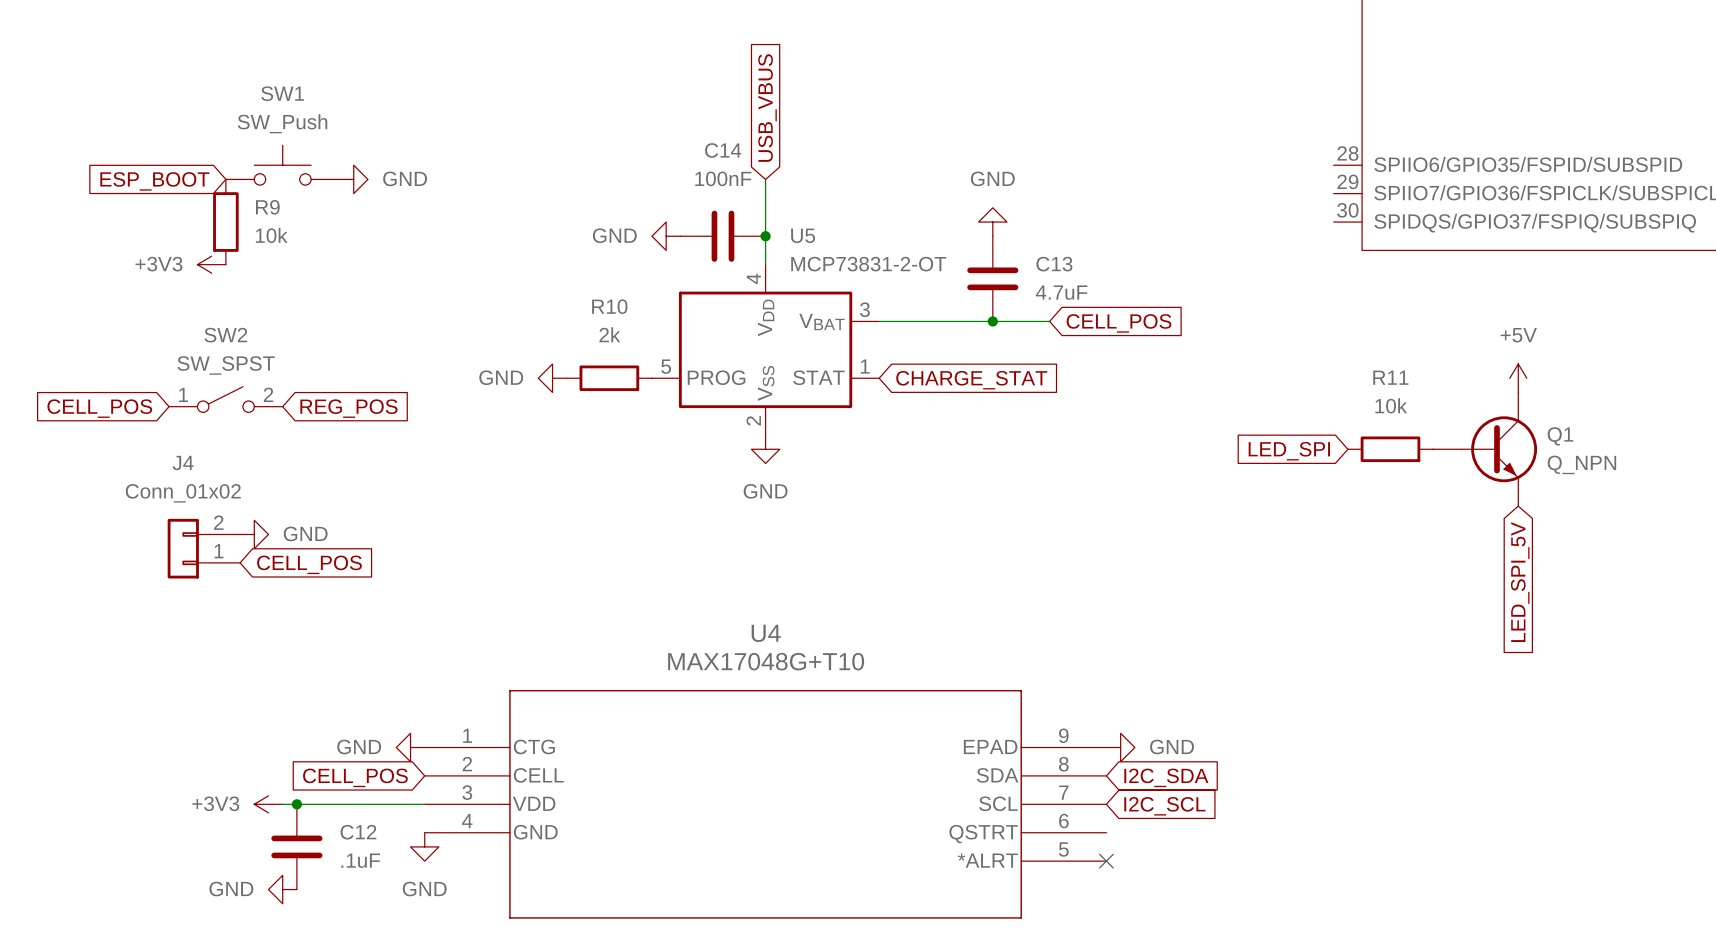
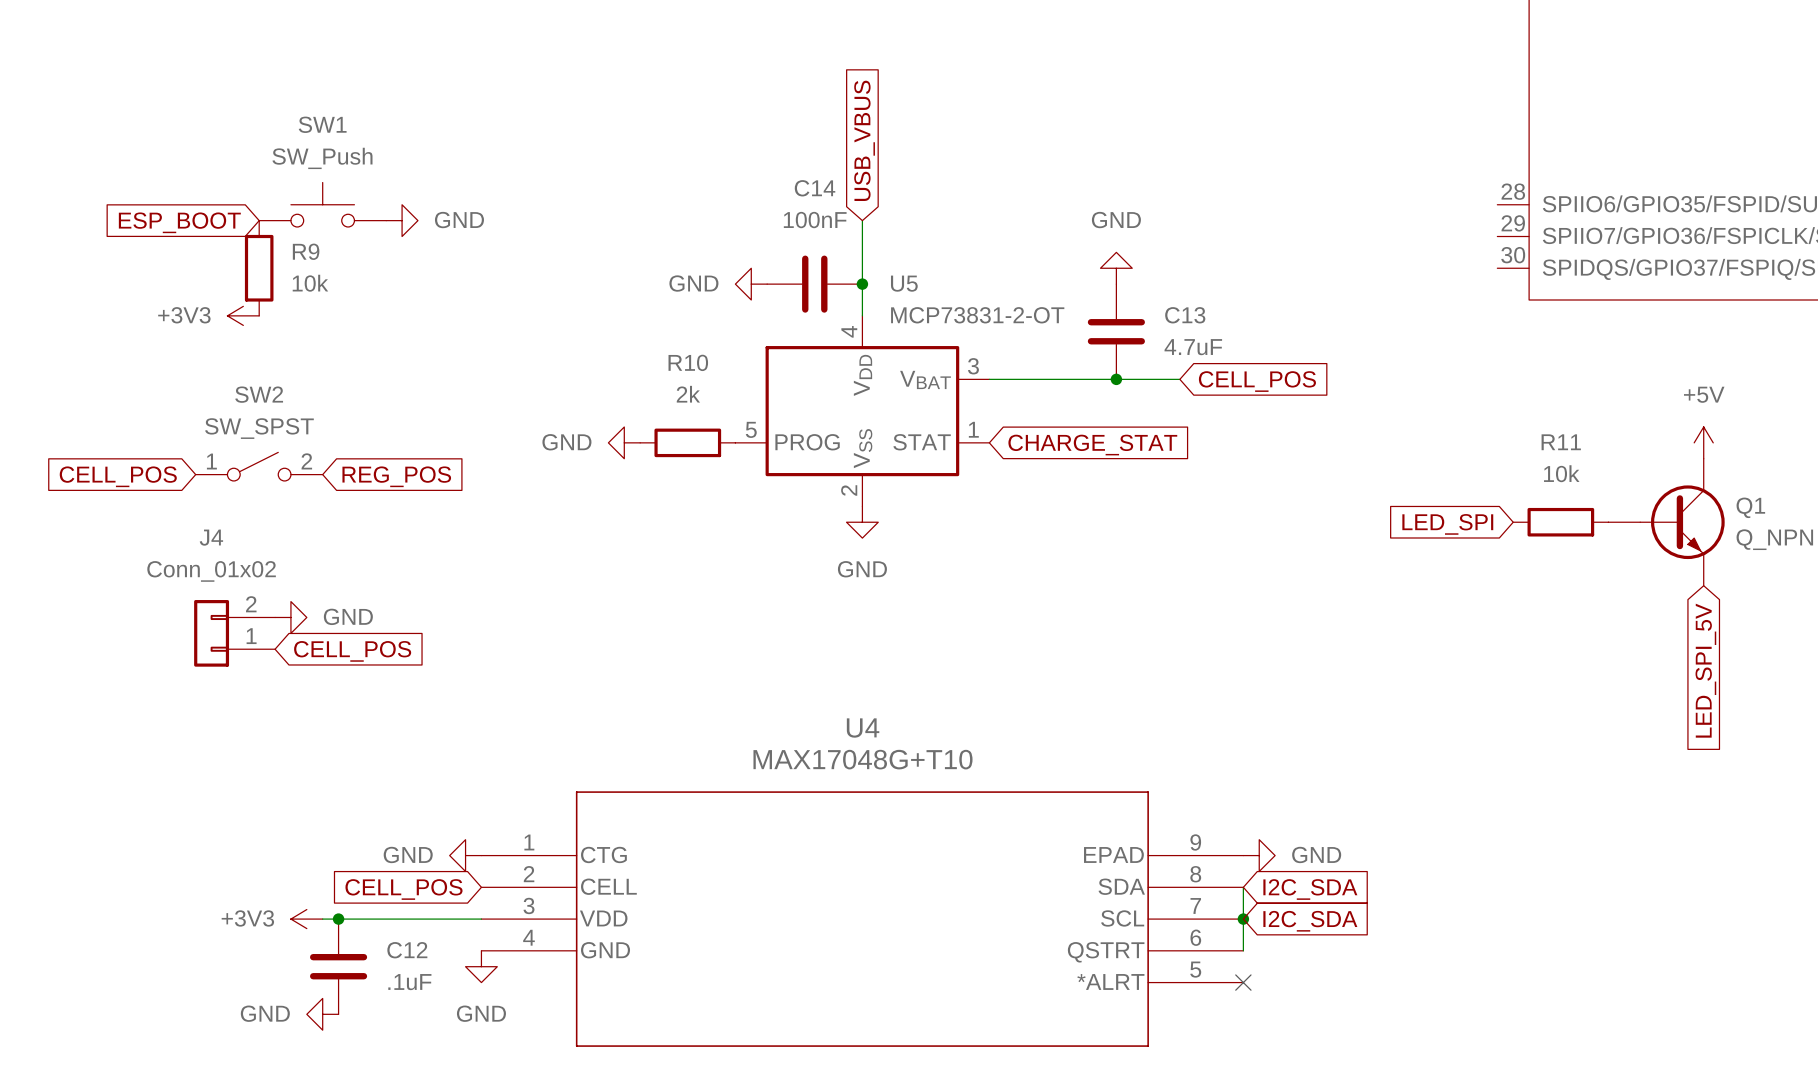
wire: none -> (1243, 887) (1243, 950)
junction: none -> (1243, 919)
global label: I2C_SCL (1164, 806) -> I2C_SDA (1310, 921)

